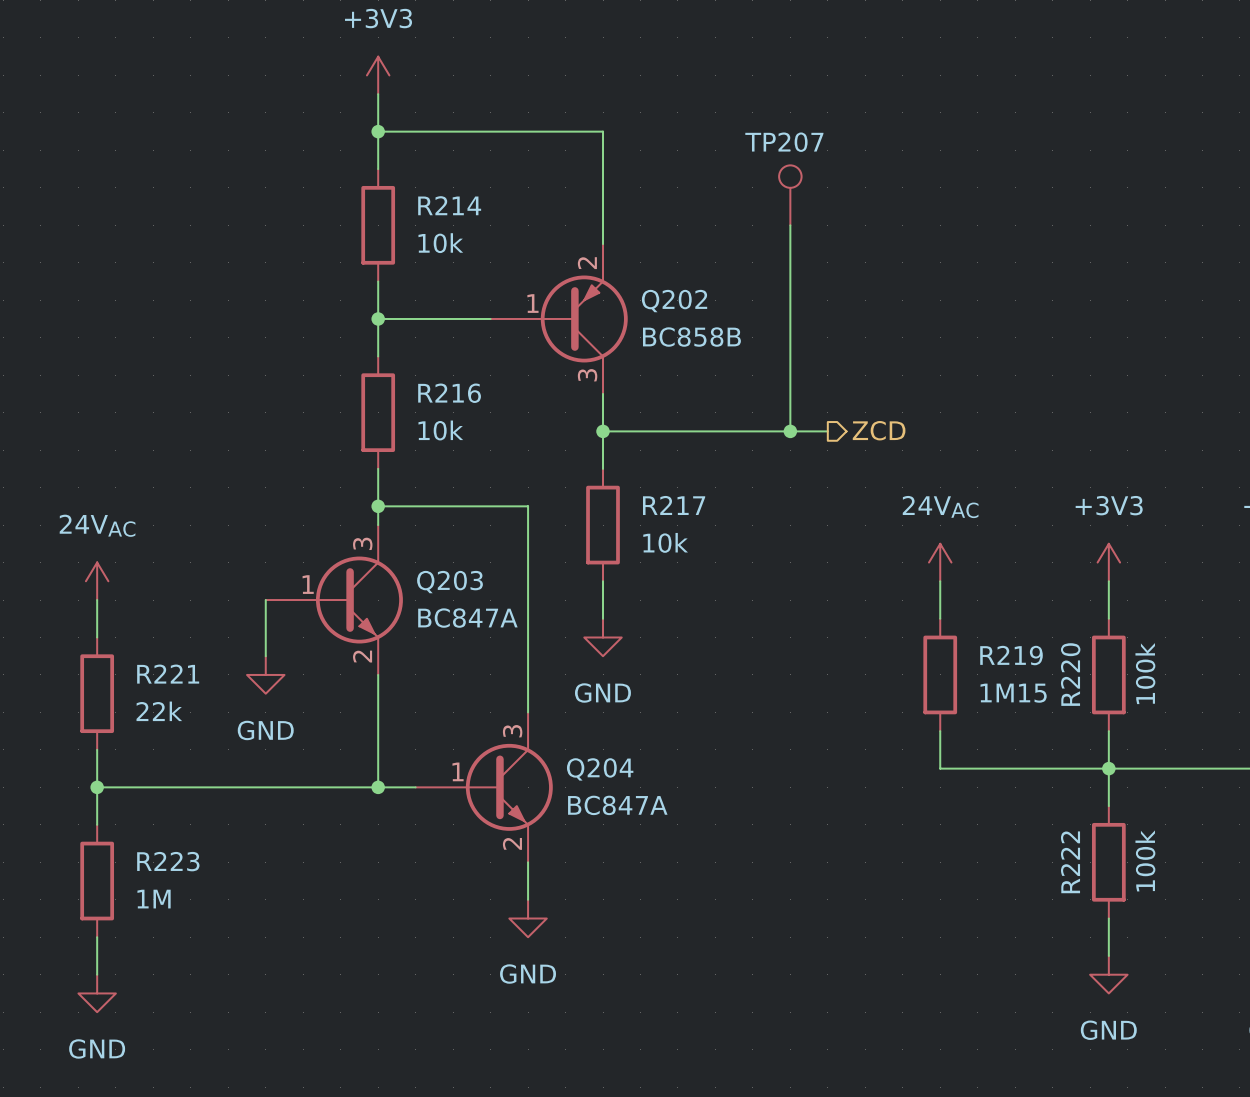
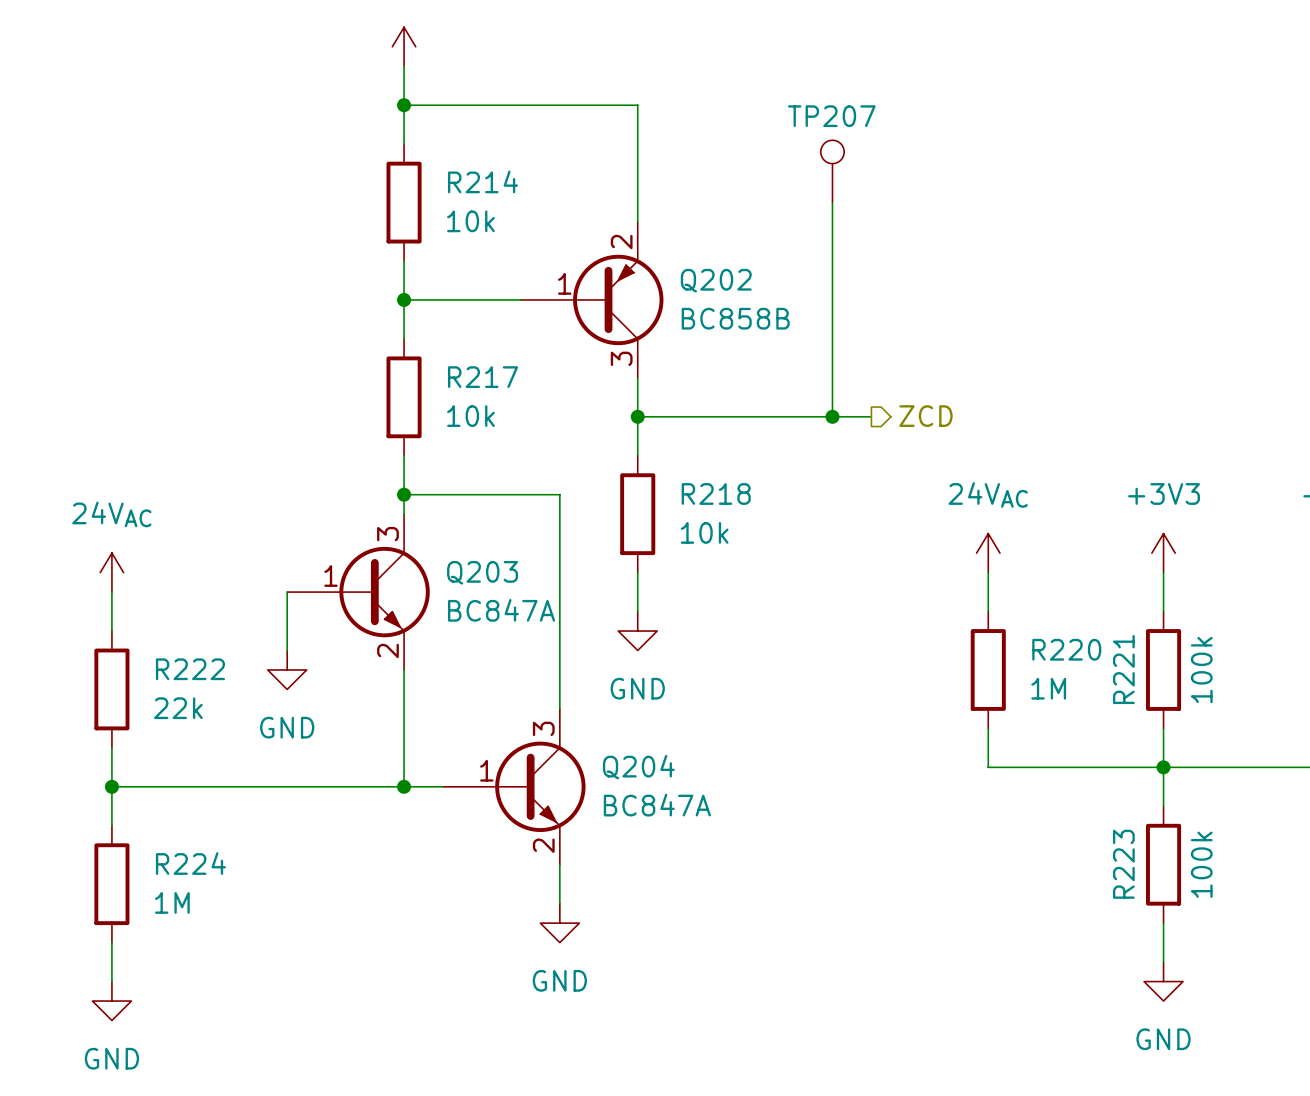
R216 name: R216 (449, 393) -> R217 (483, 377)
R217 name: R217 (674, 505) -> R218 (716, 493)
R219 name: R219 (1011, 655) -> R220 (1066, 649)
R221 name: R221 (168, 674) -> R222 (190, 669)
R220 name: R220 (1070, 674) -> R221 (1123, 669)
R219 value: 1M15 (1013, 693) -> 1M (1048, 688)
R223 name: R223 (168, 861) -> R224 (190, 863)
R222 name: R222 (1070, 862) -> R223 (1123, 864)

